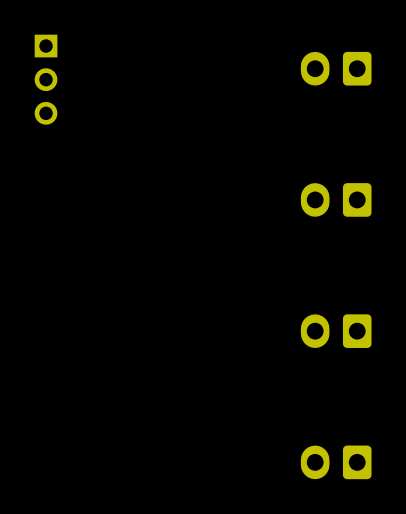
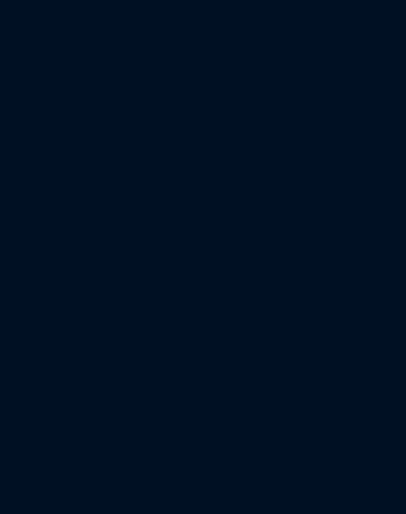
part: (336, 68) -> none
part: (46, 79) -> none
part: (336, 199) -> none
part: (336, 331) -> none
part: (336, 462) -> none

